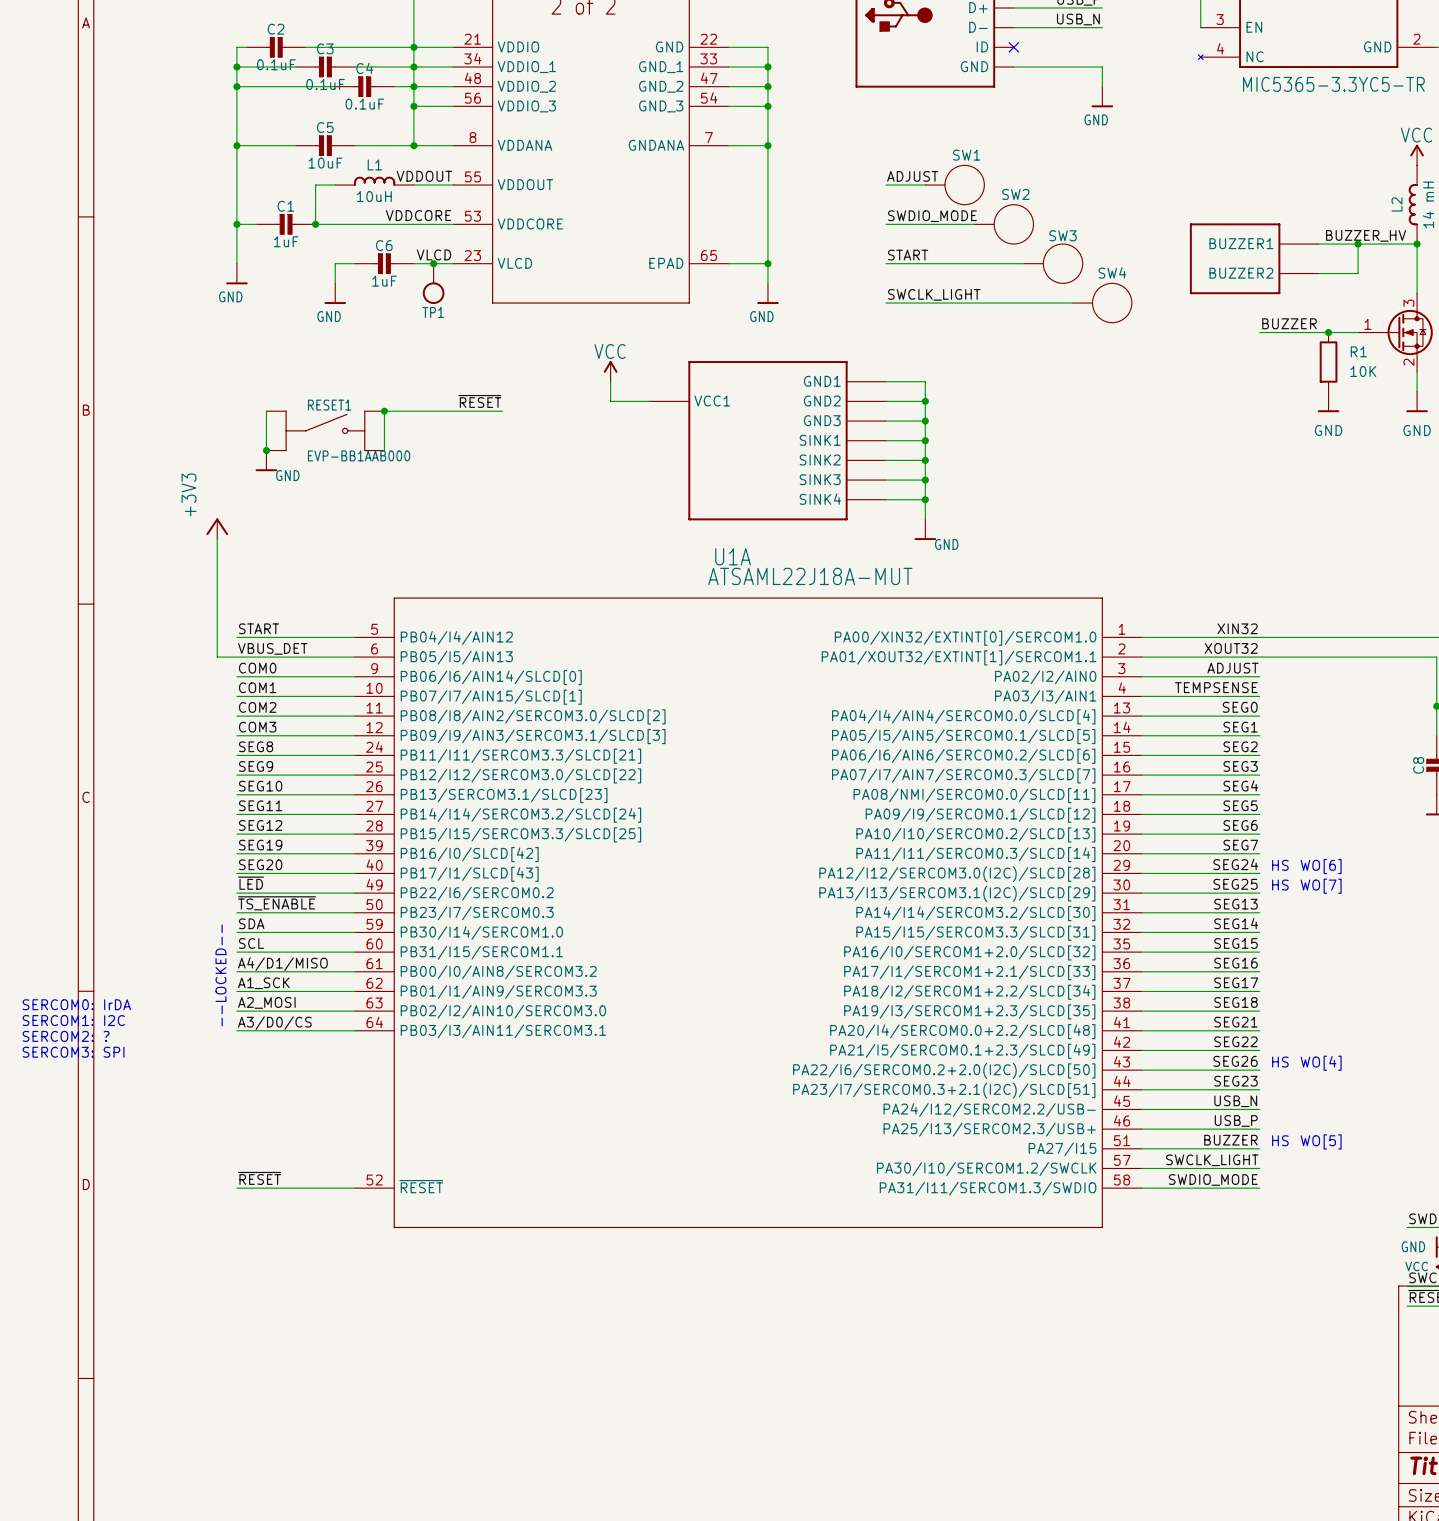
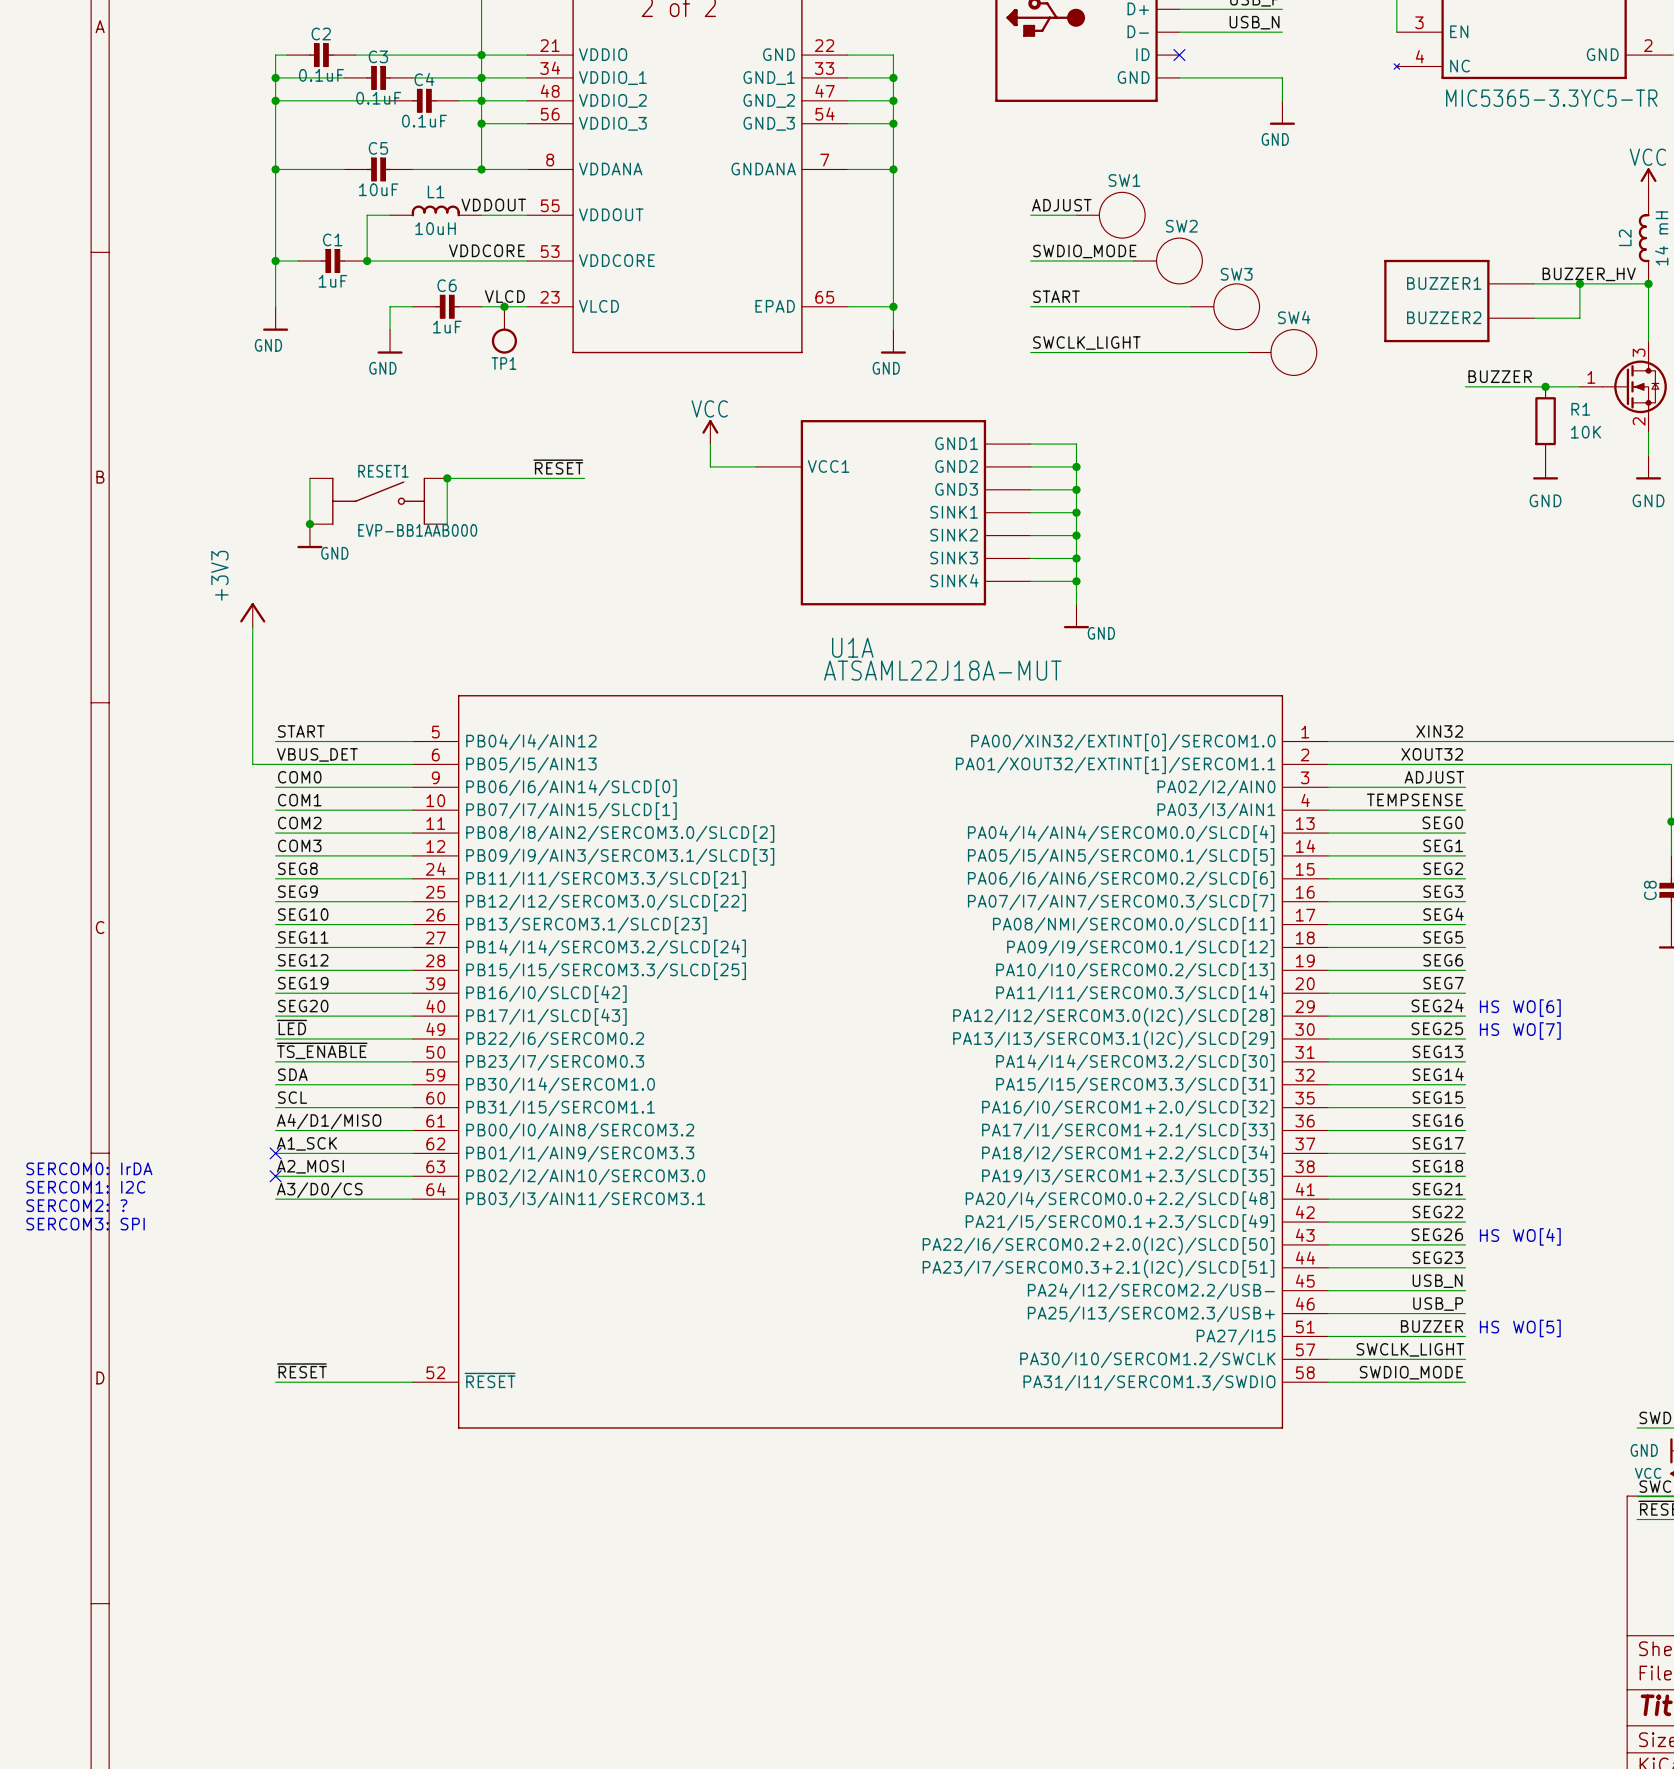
text: --LOCKED-- (220, 975) -> none
no-connect mark: none -> (275, 1153)
no-connect mark: none -> (275, 1176)

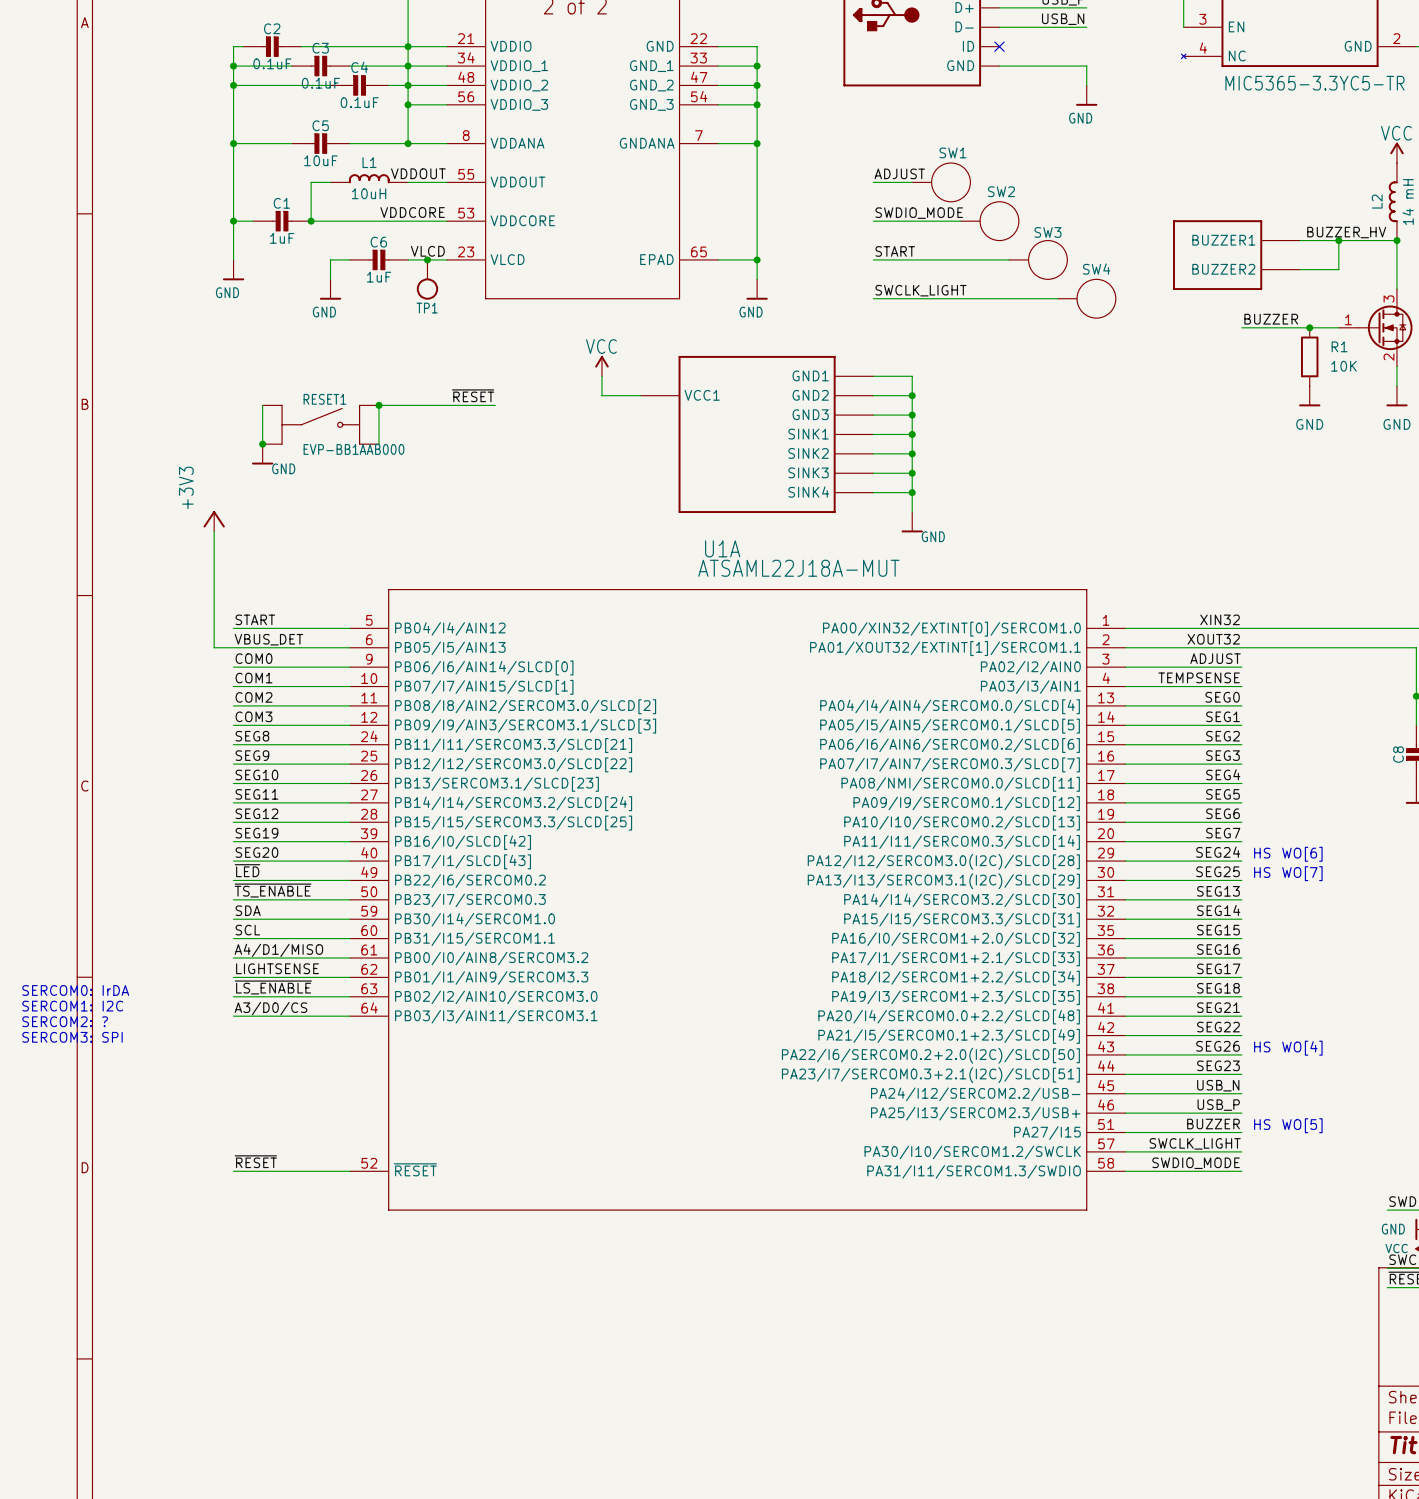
label: A1_SCK (306, 1143) -> LIGHTSENSE (277, 968)
no-connect mark: (275, 1153) -> none
label: A2_MOSI (310, 1166) -> ~{LS_ENABLE} (273, 987)
no-connect mark: (275, 1176) -> none

